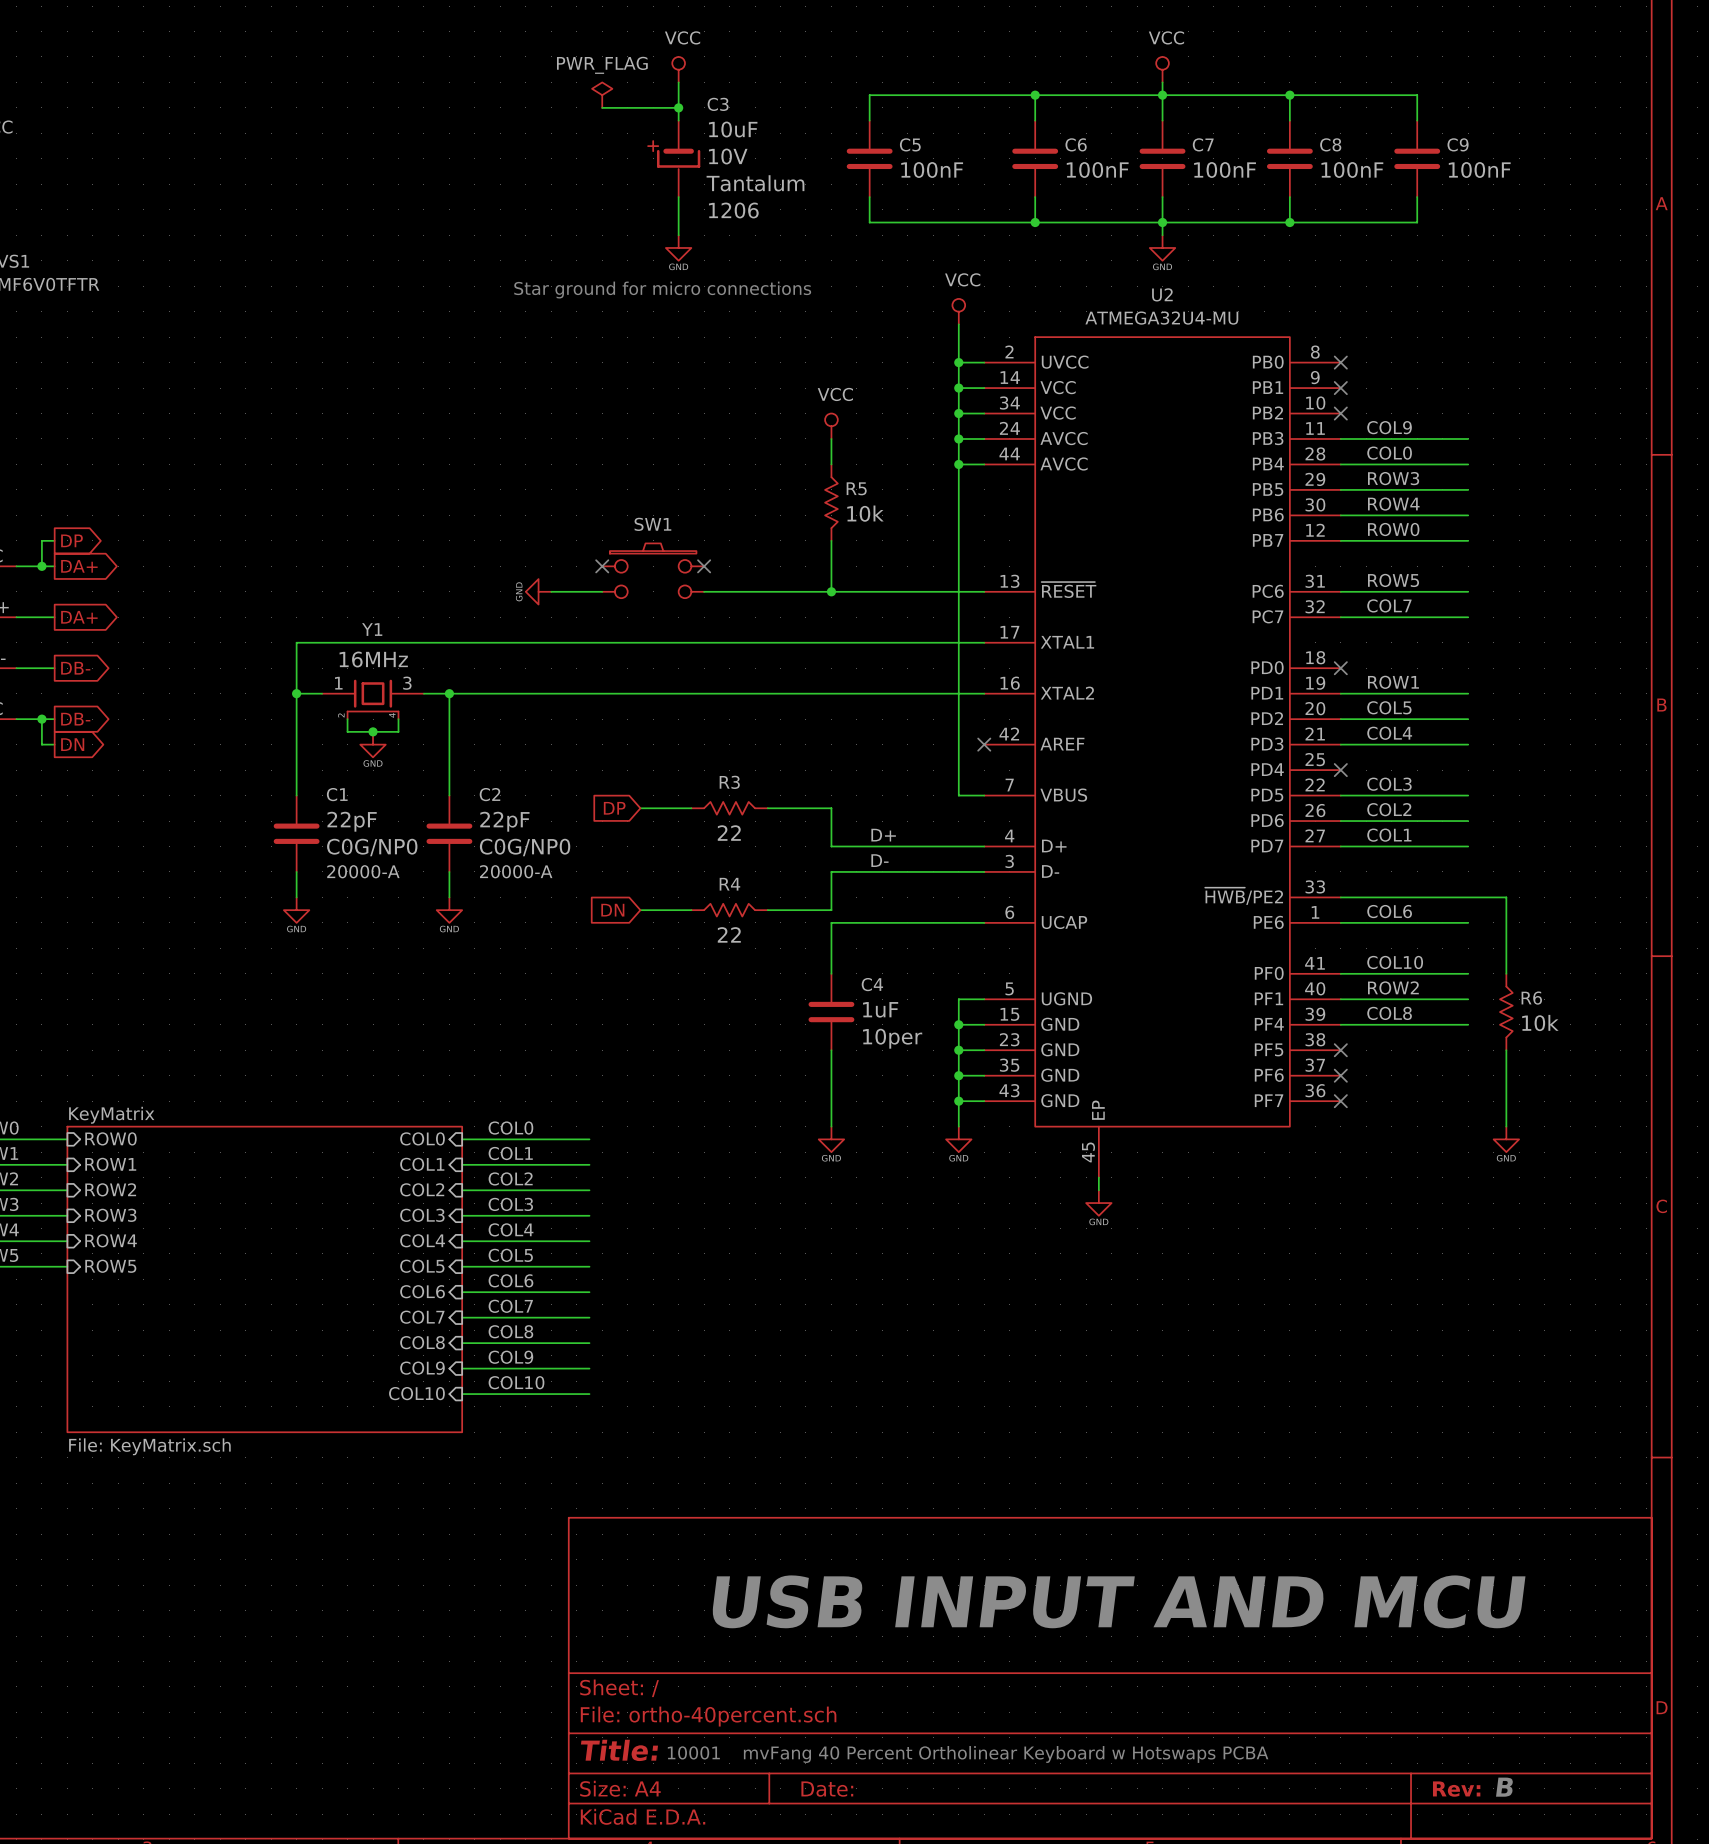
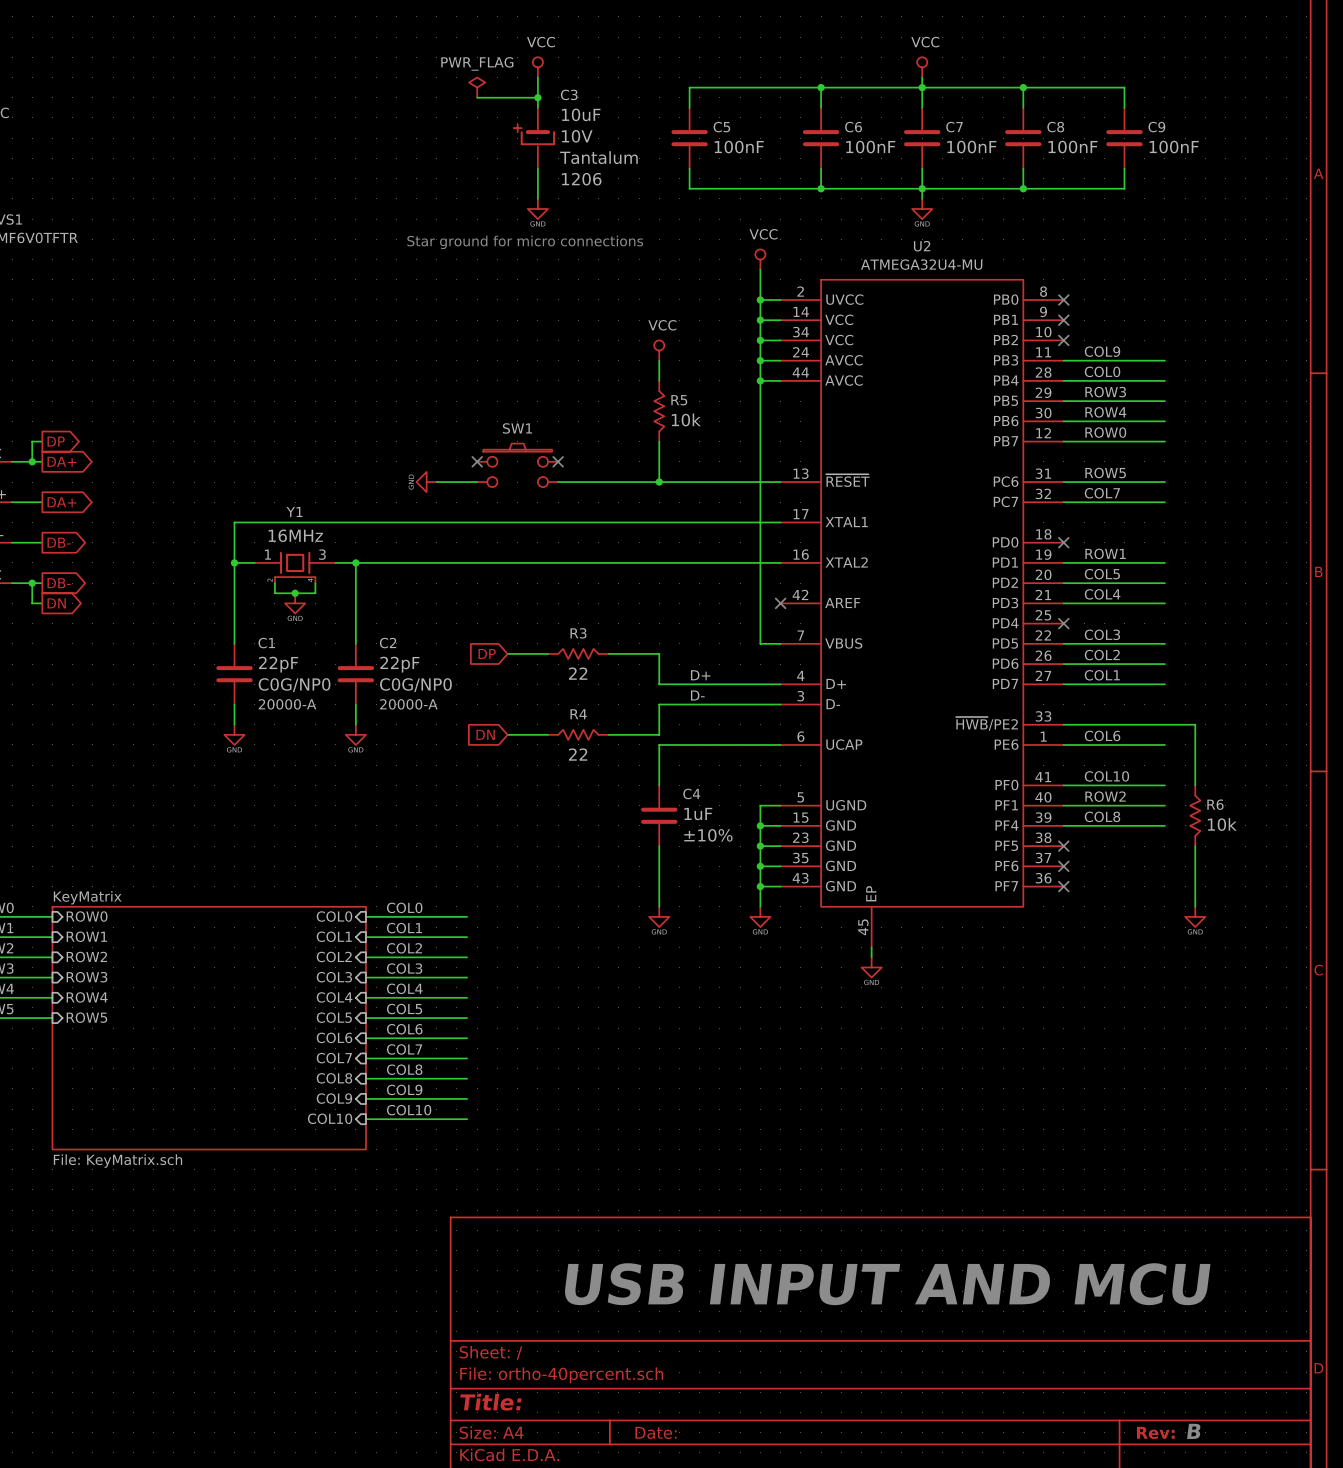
C4 text: 10per (892, 1038) -> ±10% (708, 835)
text: 10001 (693, 1752) -> none
text: mvFang 40 Percent Ortholinear Keyboard w Hotswaps PCBA (1006, 1754) -> none

